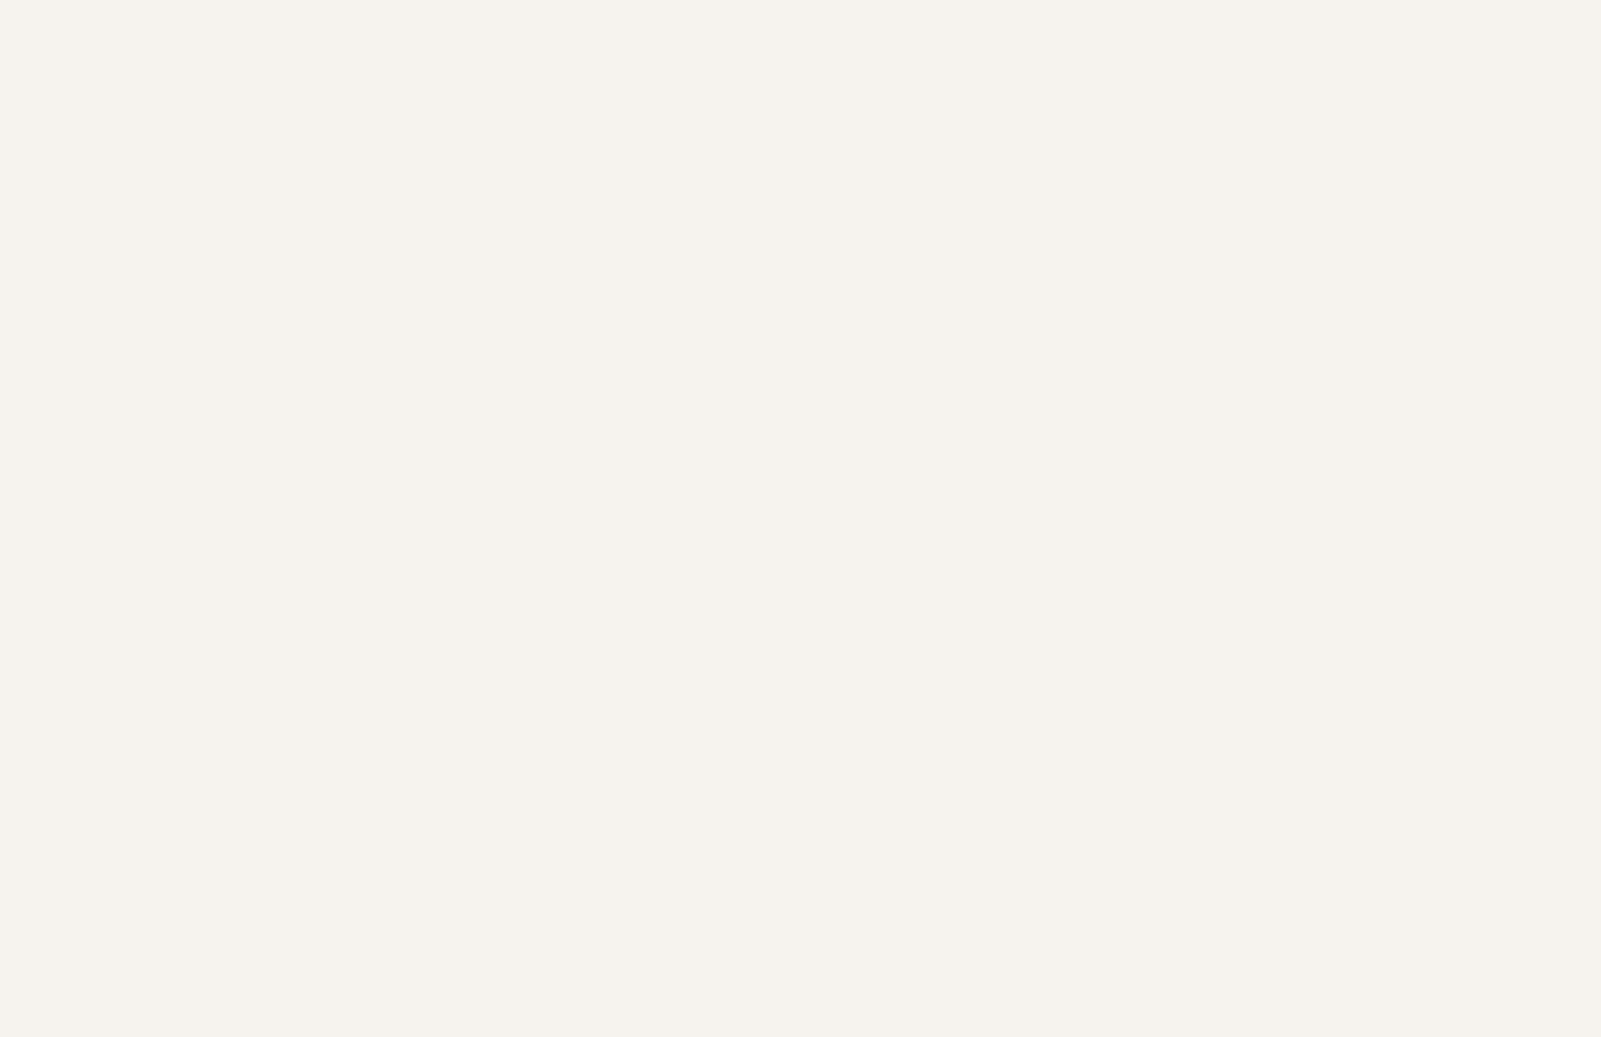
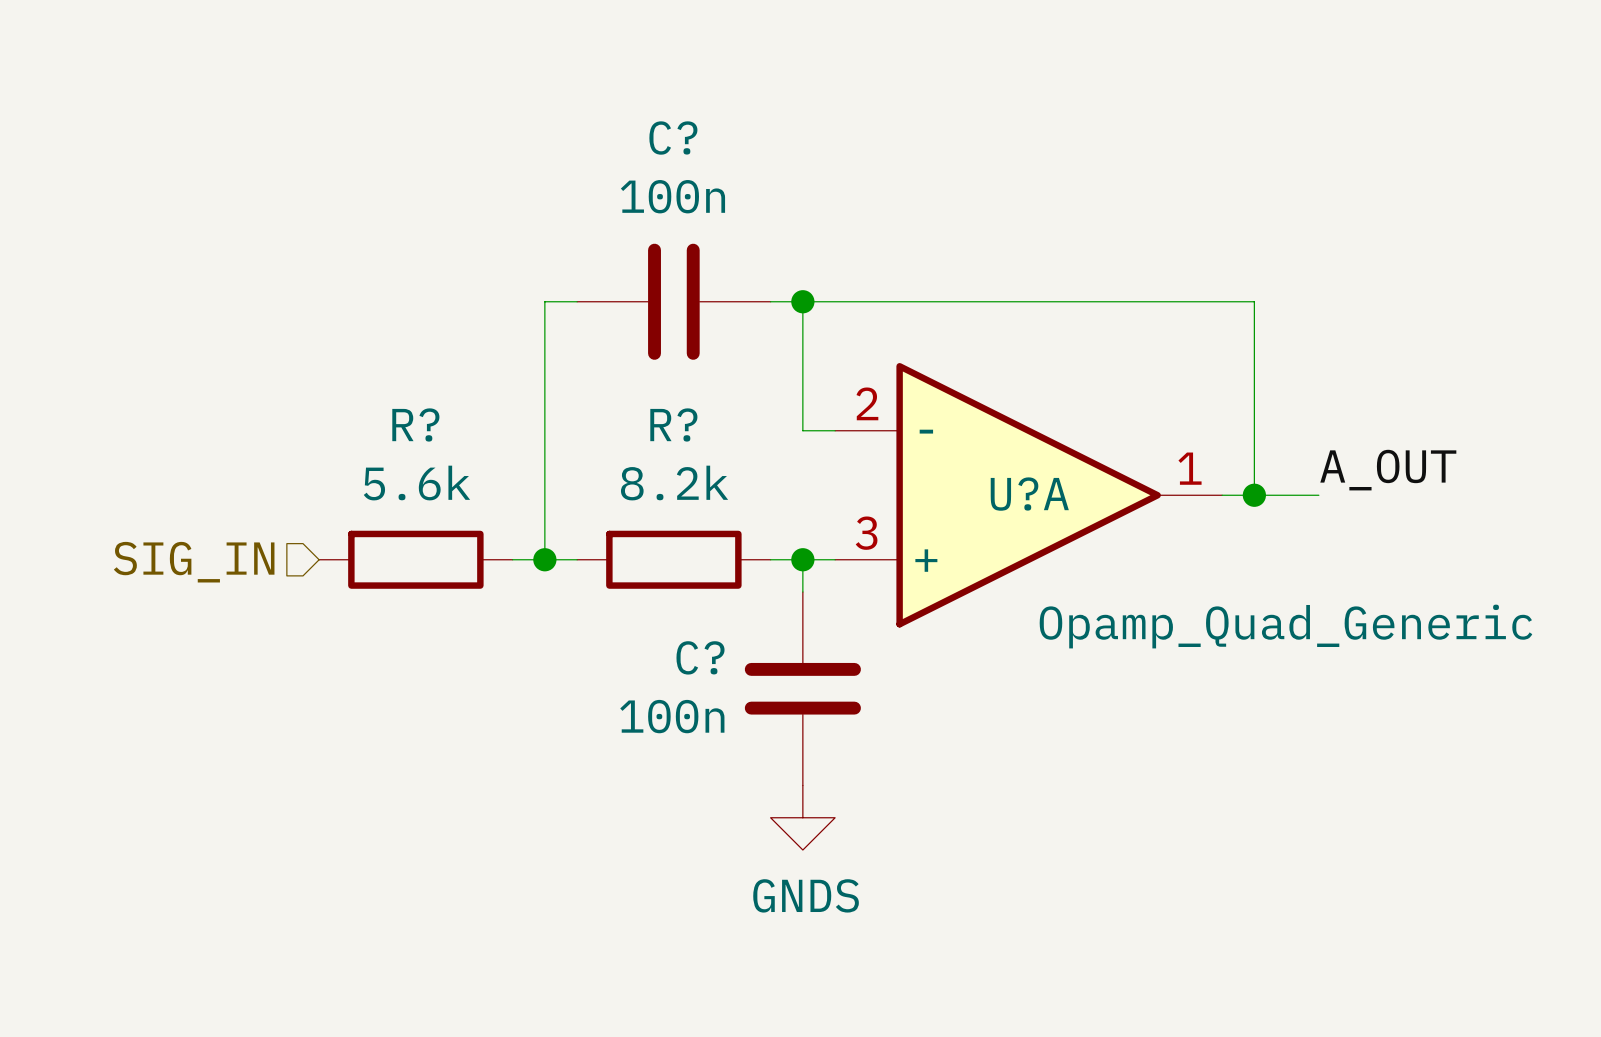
wire: none -> (577, 301) (544, 301) (544, 559)
C?: none -> 100n (673, 301)
wire: none -> (770, 301) (1254, 301) (1254, 495)
wire: none -> (802, 301) (802, 430) (835, 430)
junction: none -> (802, 301)
label: none -> A_OUT (1388, 470)
U?A: none -> Opamp_Quad_Generic (1028, 495)
wire: none -> (1222, 495) (1318, 495)
junction: none -> (1254, 495)
R?: none -> 5.6k (415, 559)
wire: none -> (512, 559) (577, 559)
junction: none -> (544, 559)
R?: none -> 8.2k (673, 559)
wire: none -> (770, 559) (835, 559)
wire: none -> (802, 559) (802, 592)
junction: none -> (802, 559)
hierarchical label: none -> SIG_IN (194, 562)
C?: none -> 100n (802, 688)
power symbol: none -> GNDS (802, 817)

